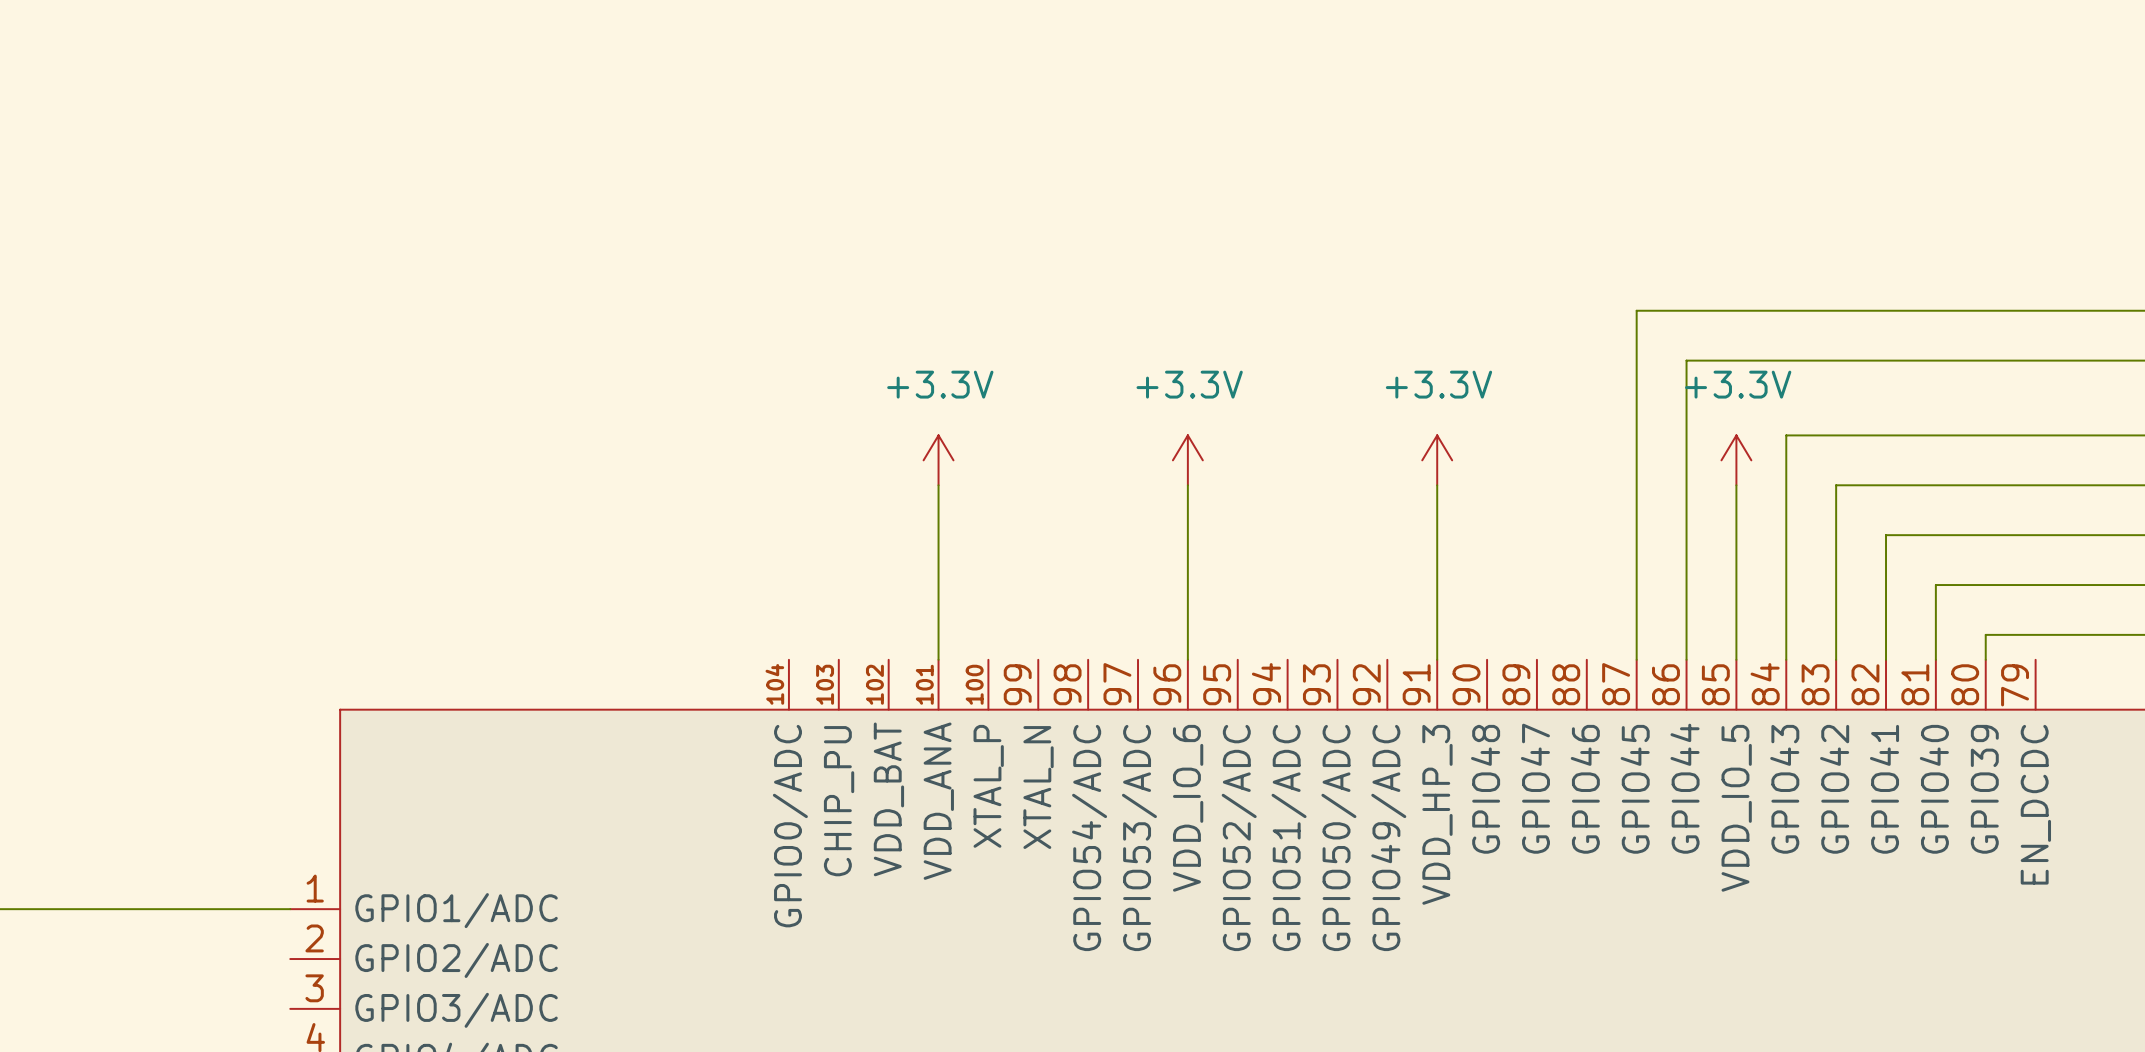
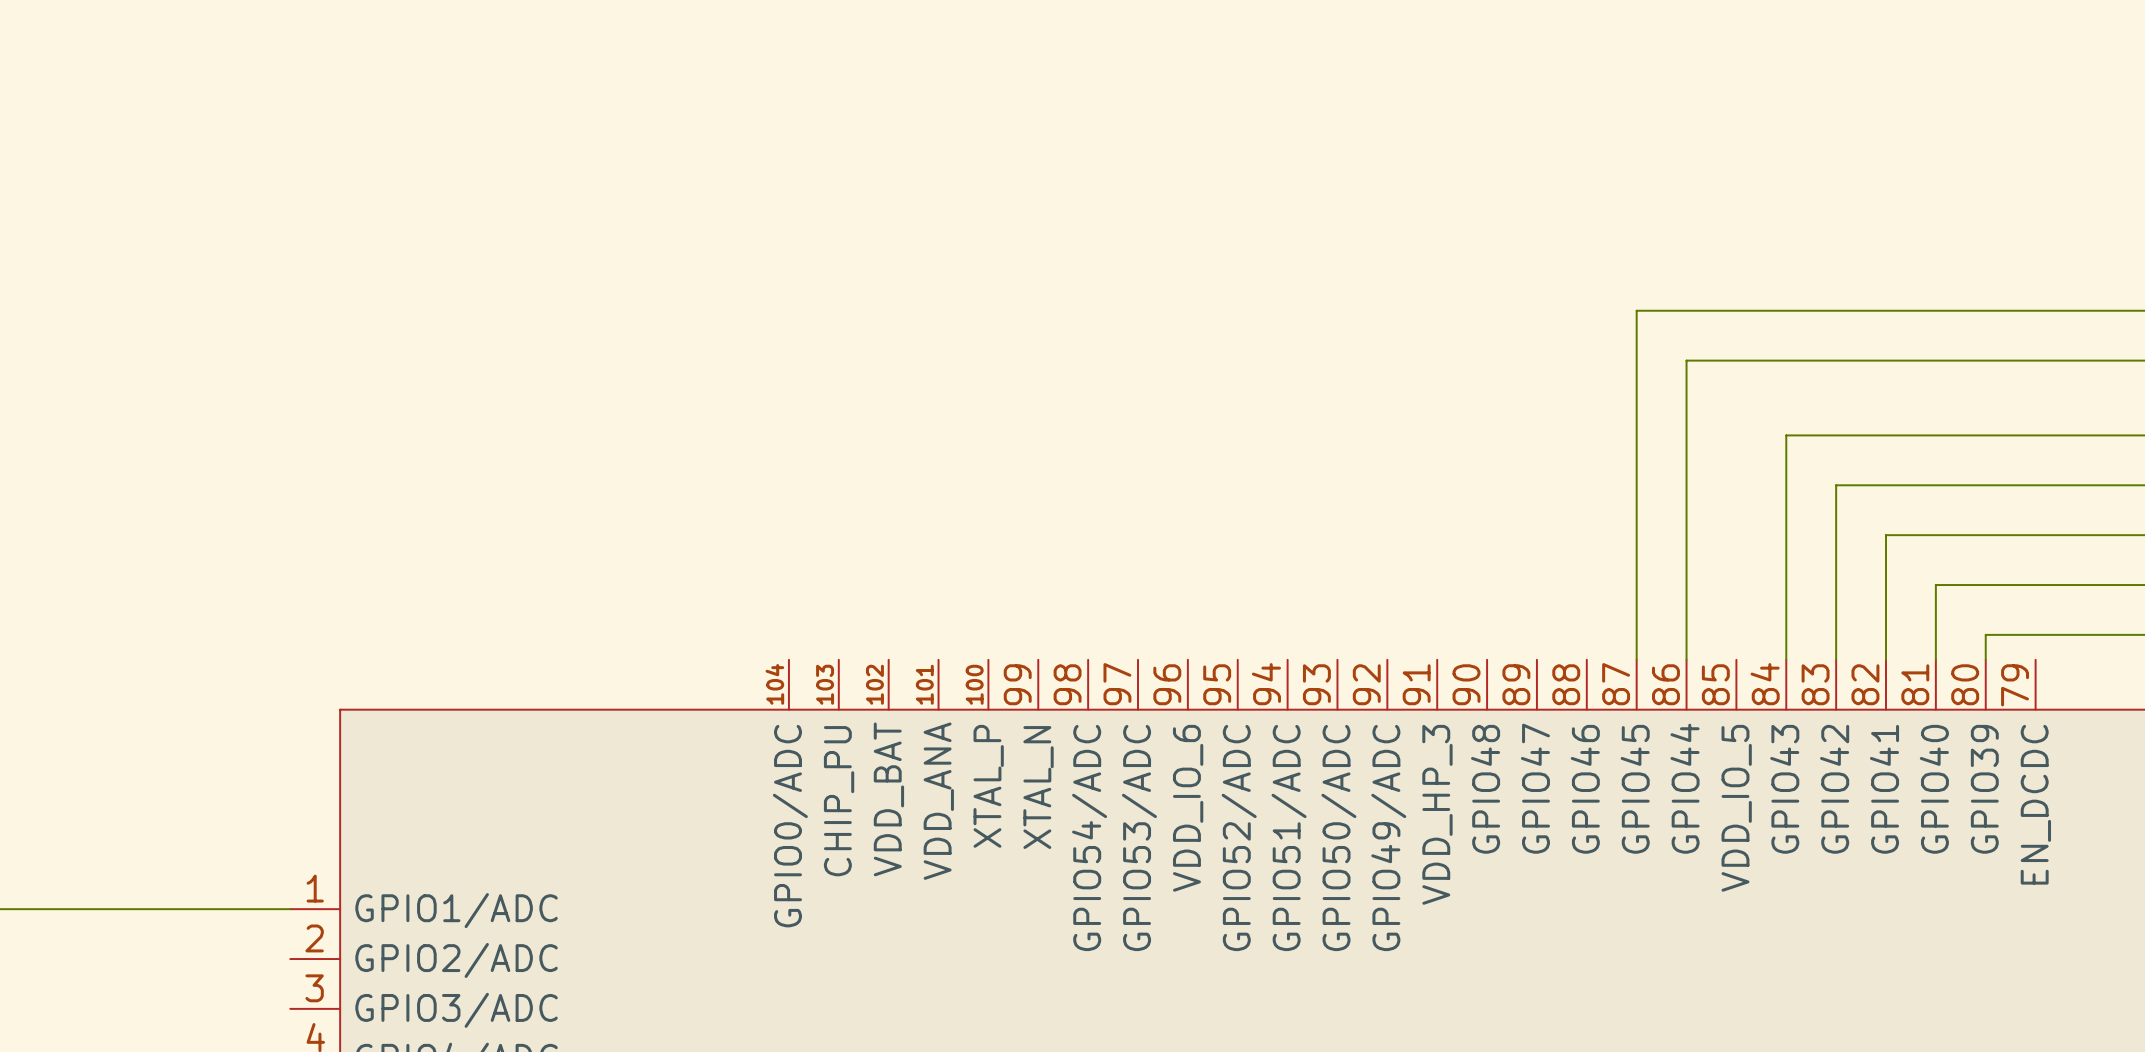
power symbol: +3.3V (938, 460) -> none
power symbol: +3.3V (1187, 460) -> none
power symbol: +3.3V (1437, 460) -> none
power symbol: +3.3V (1736, 460) -> none
wire: (938, 485) (938, 659) -> none
wire: (1187, 485) (1187, 659) -> none
wire: (1437, 485) (1437, 659) -> none
wire: (1736, 485) (1736, 659) -> none

